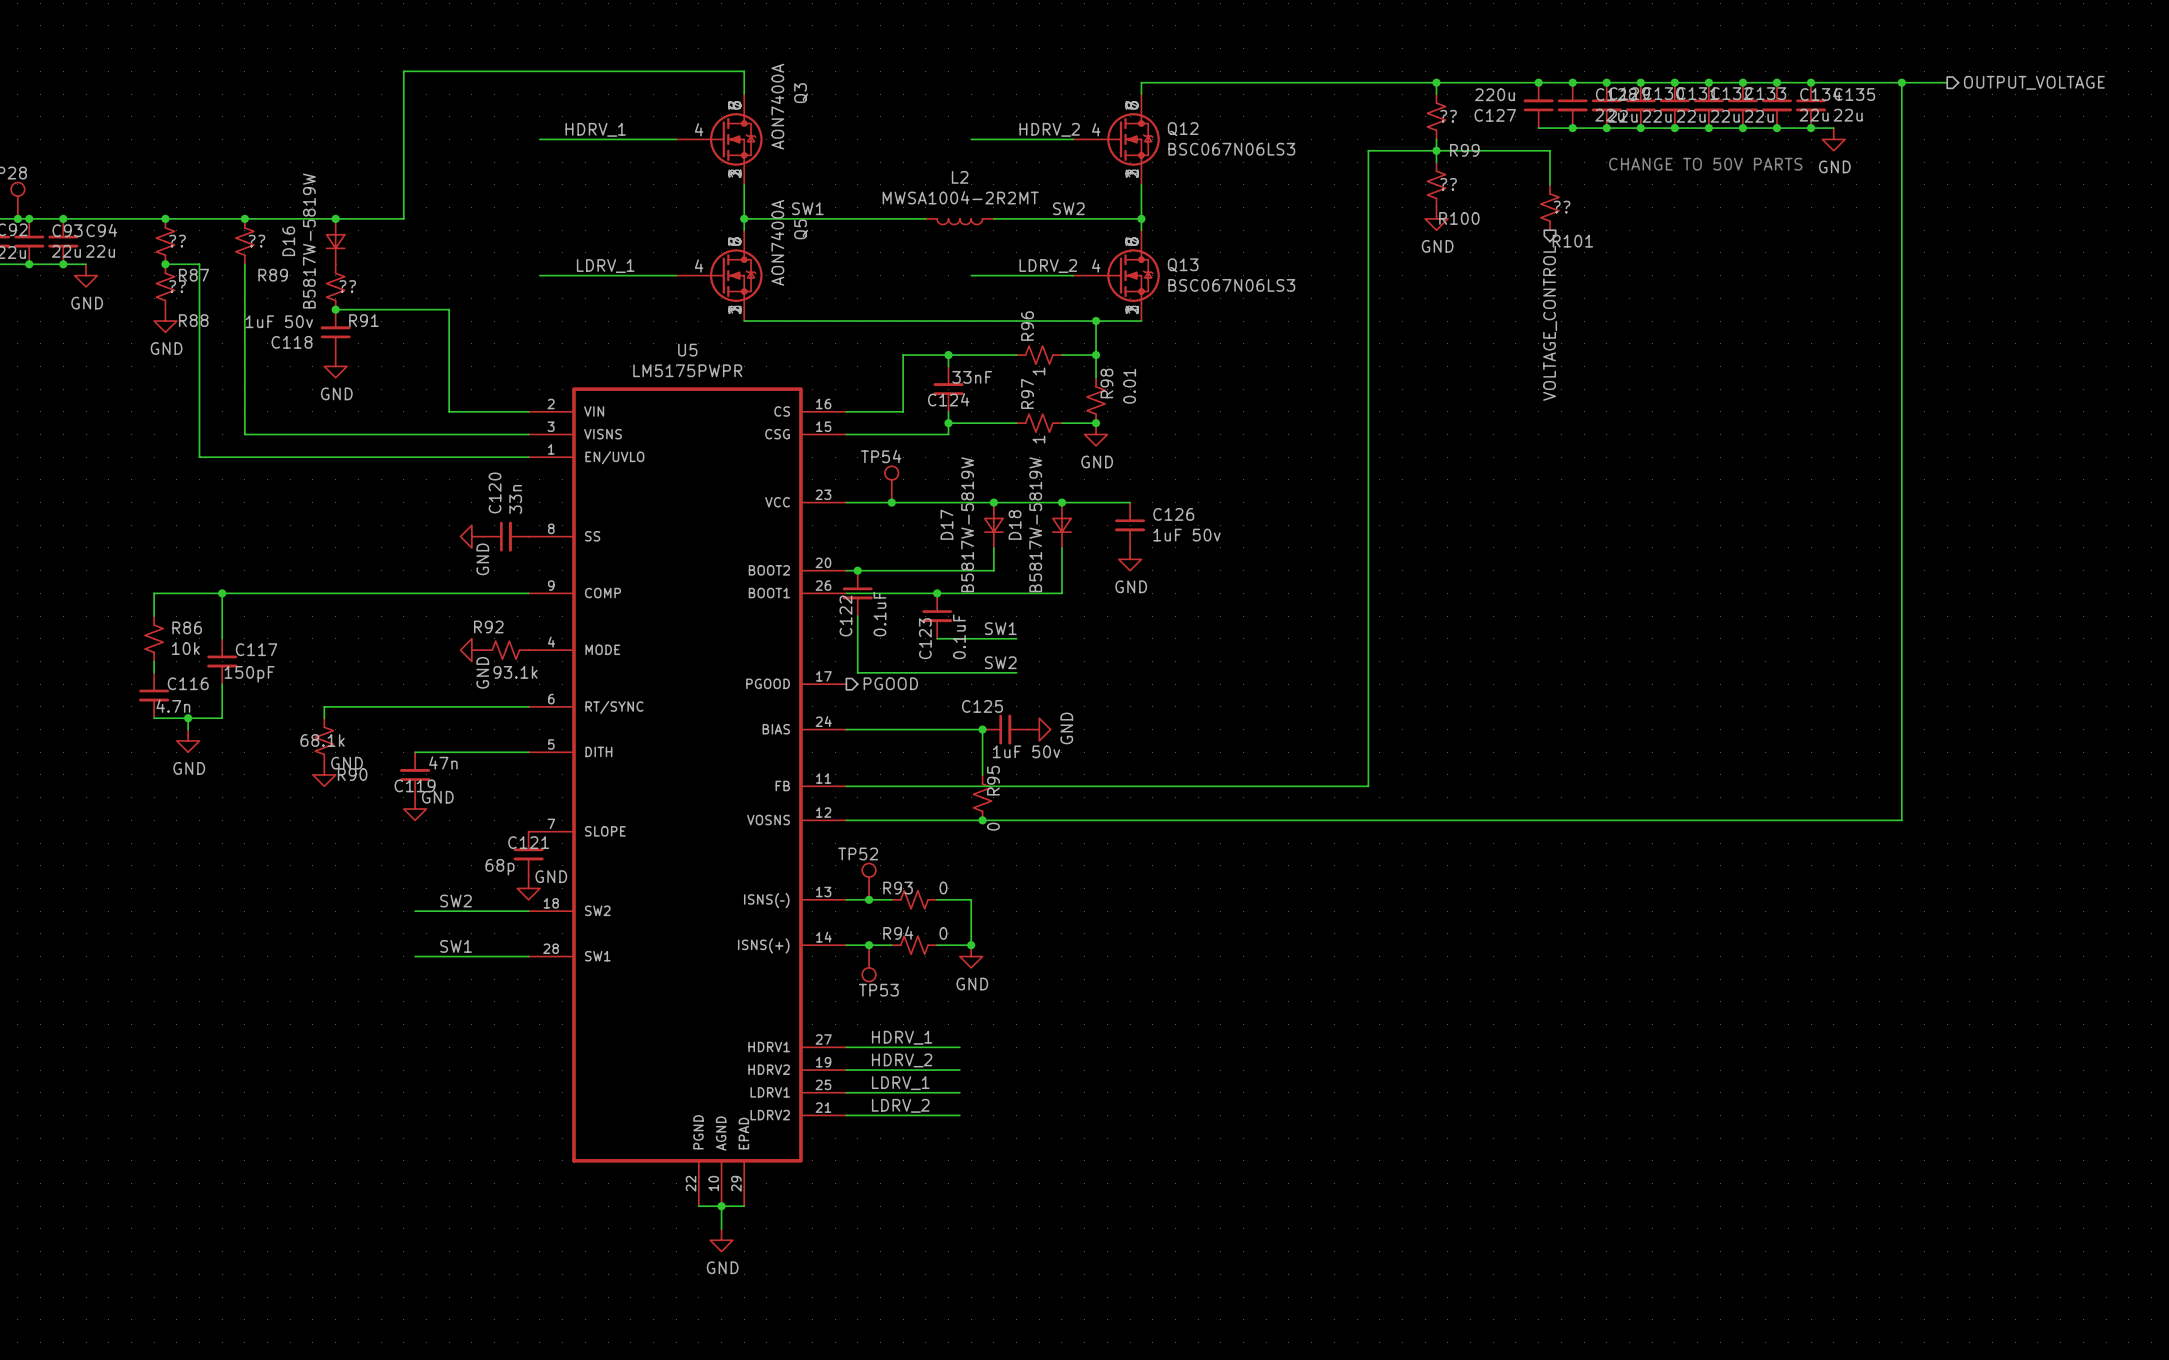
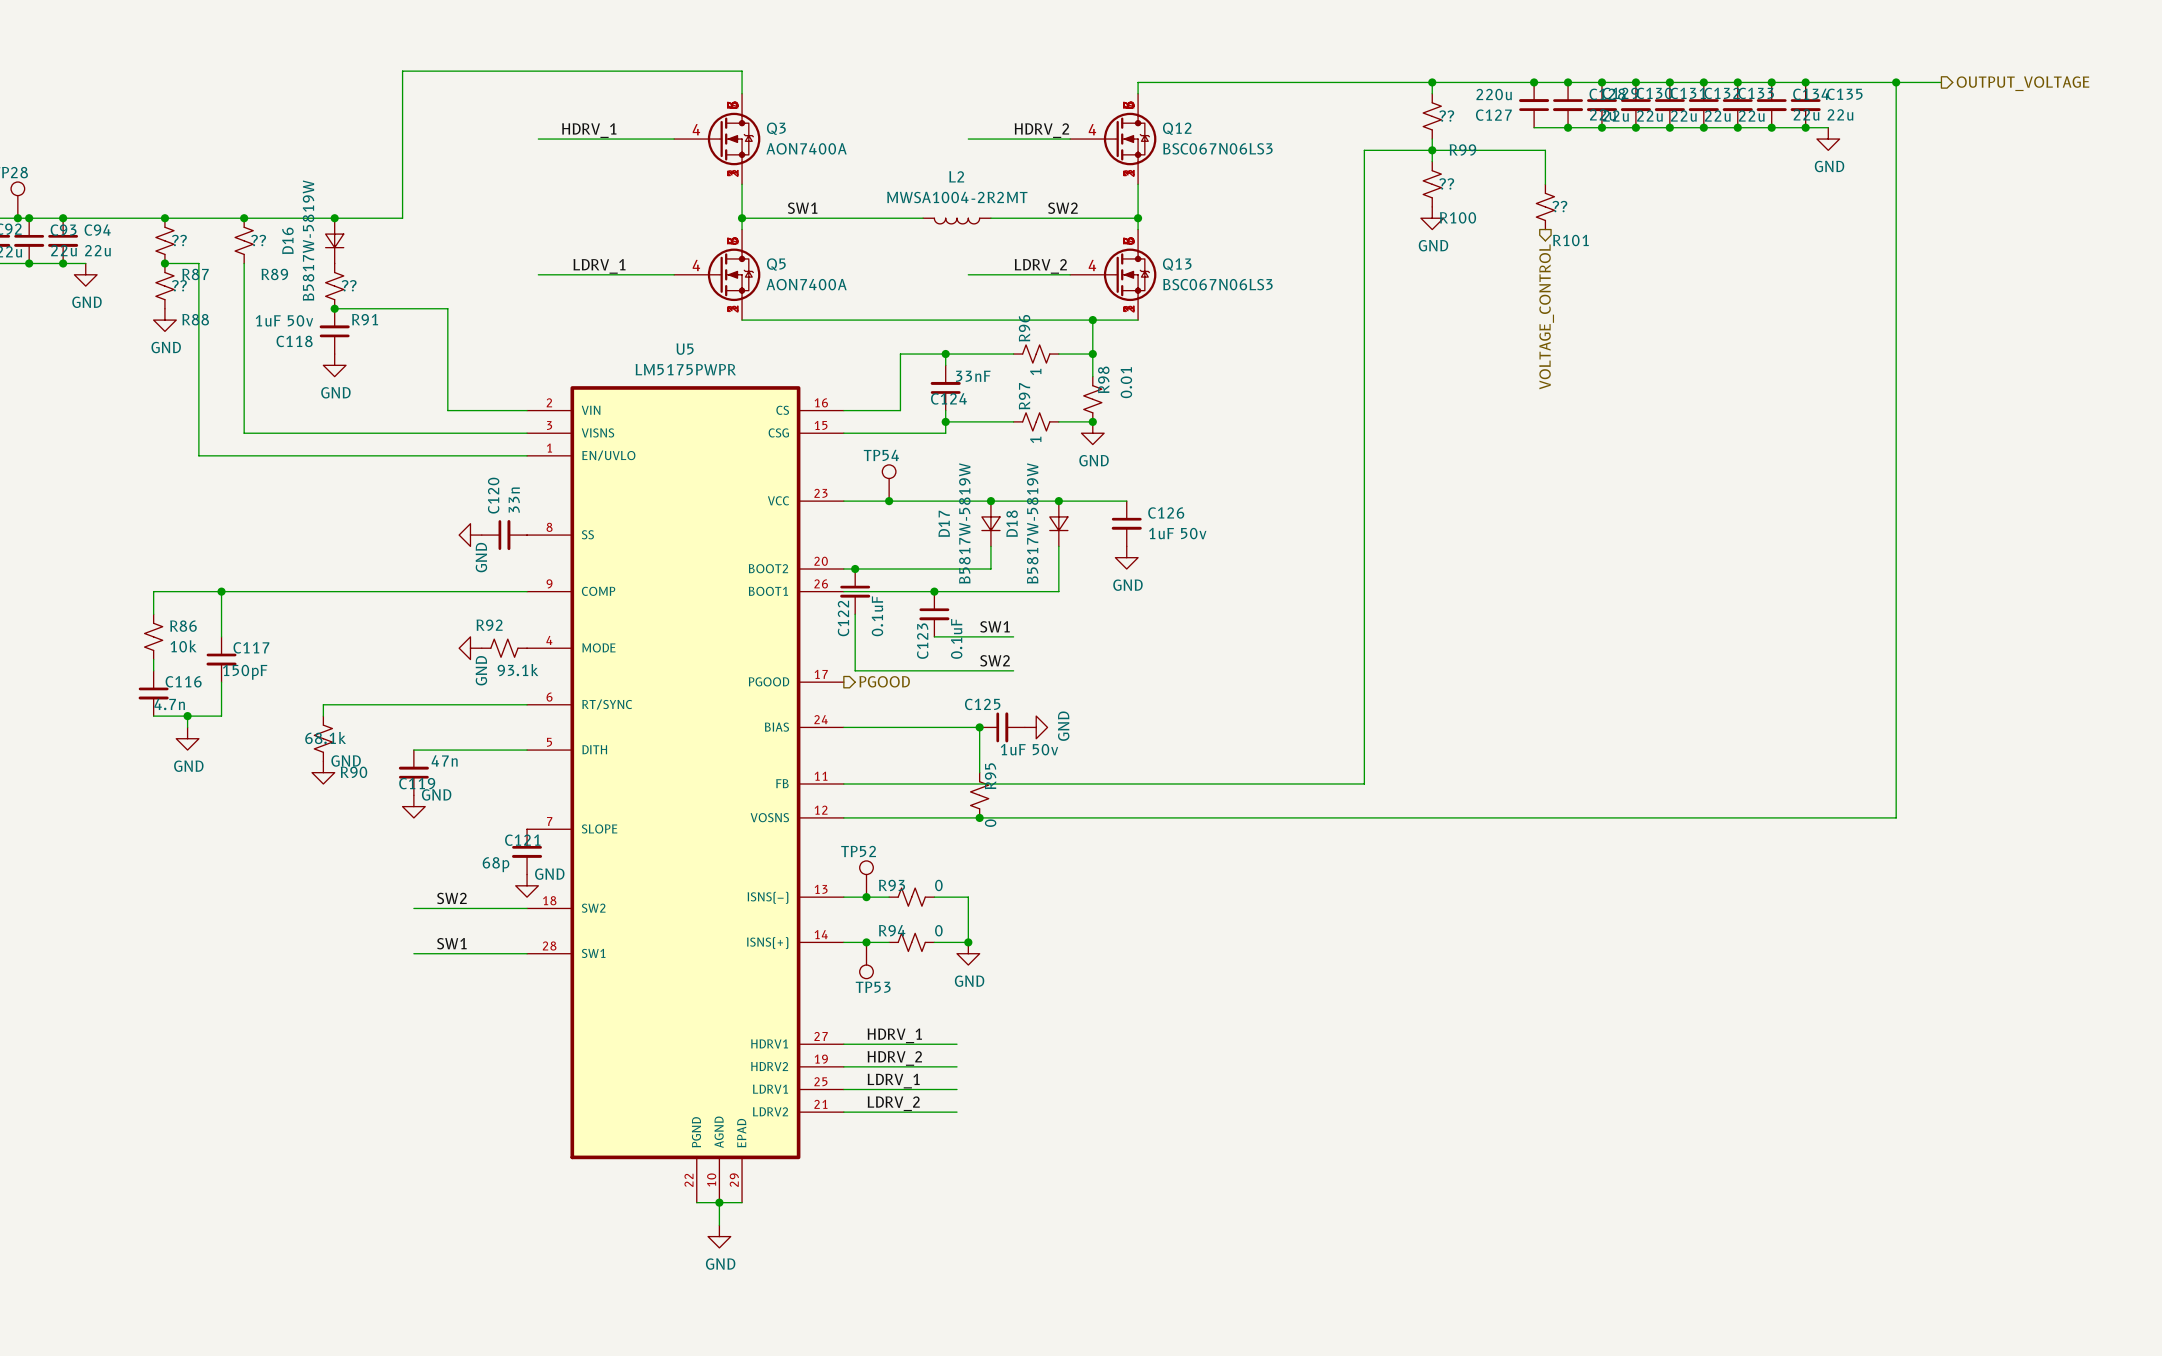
Q3 name rotation: 0° (801, 93) -> 90° clockwise (776, 128)
Q3 name position: Q3 (801, 93) -> Q3 (776, 128)
Q3 value rotation: 0° (777, 106) -> 90° clockwise (806, 148)
text: CHANGE TO 50V PARTS (1705, 164) -> none
Q5 name rotation: 0° (801, 229) -> 90° clockwise (776, 264)
Q5 name position: Q5 (801, 229) -> Q5 (776, 264)
Q5 value rotation: 0° (777, 242) -> 90° clockwise (806, 284)

